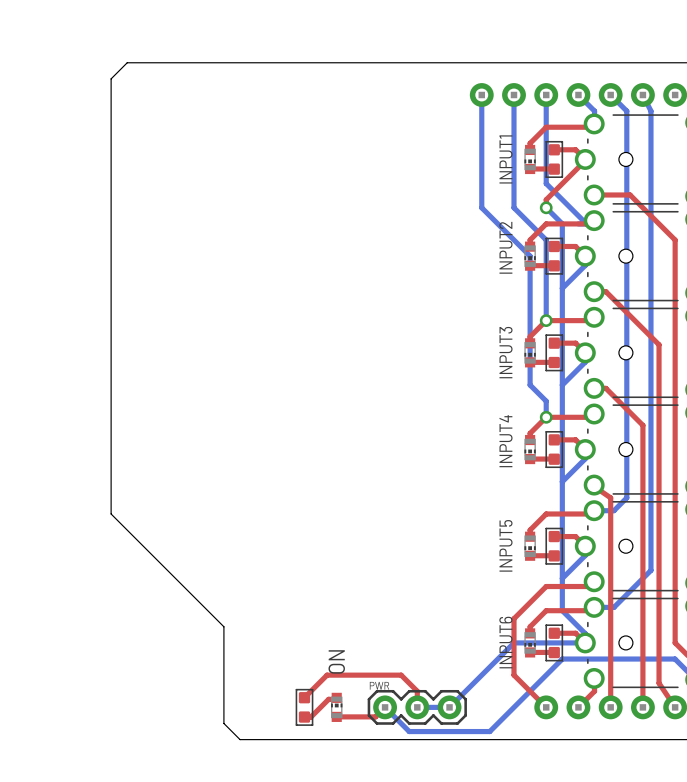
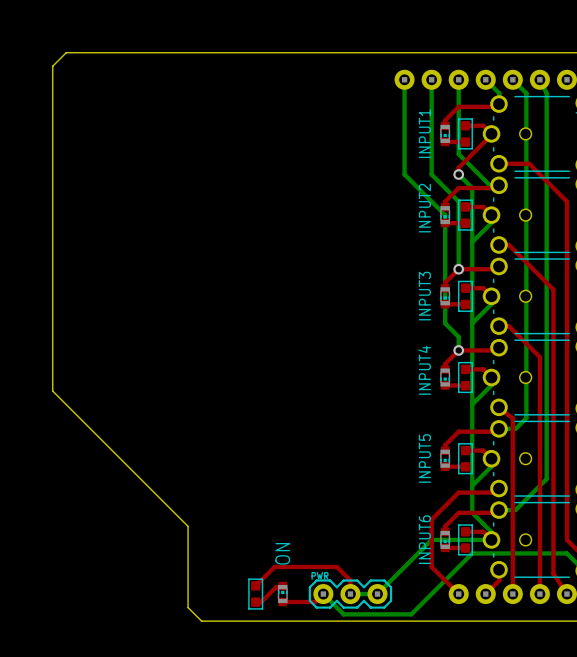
board edge: (127, 62) (111, 78) (111, 513) -> (106, 52) (66, 52) (52, 66) (52, 391) (93, 431)

